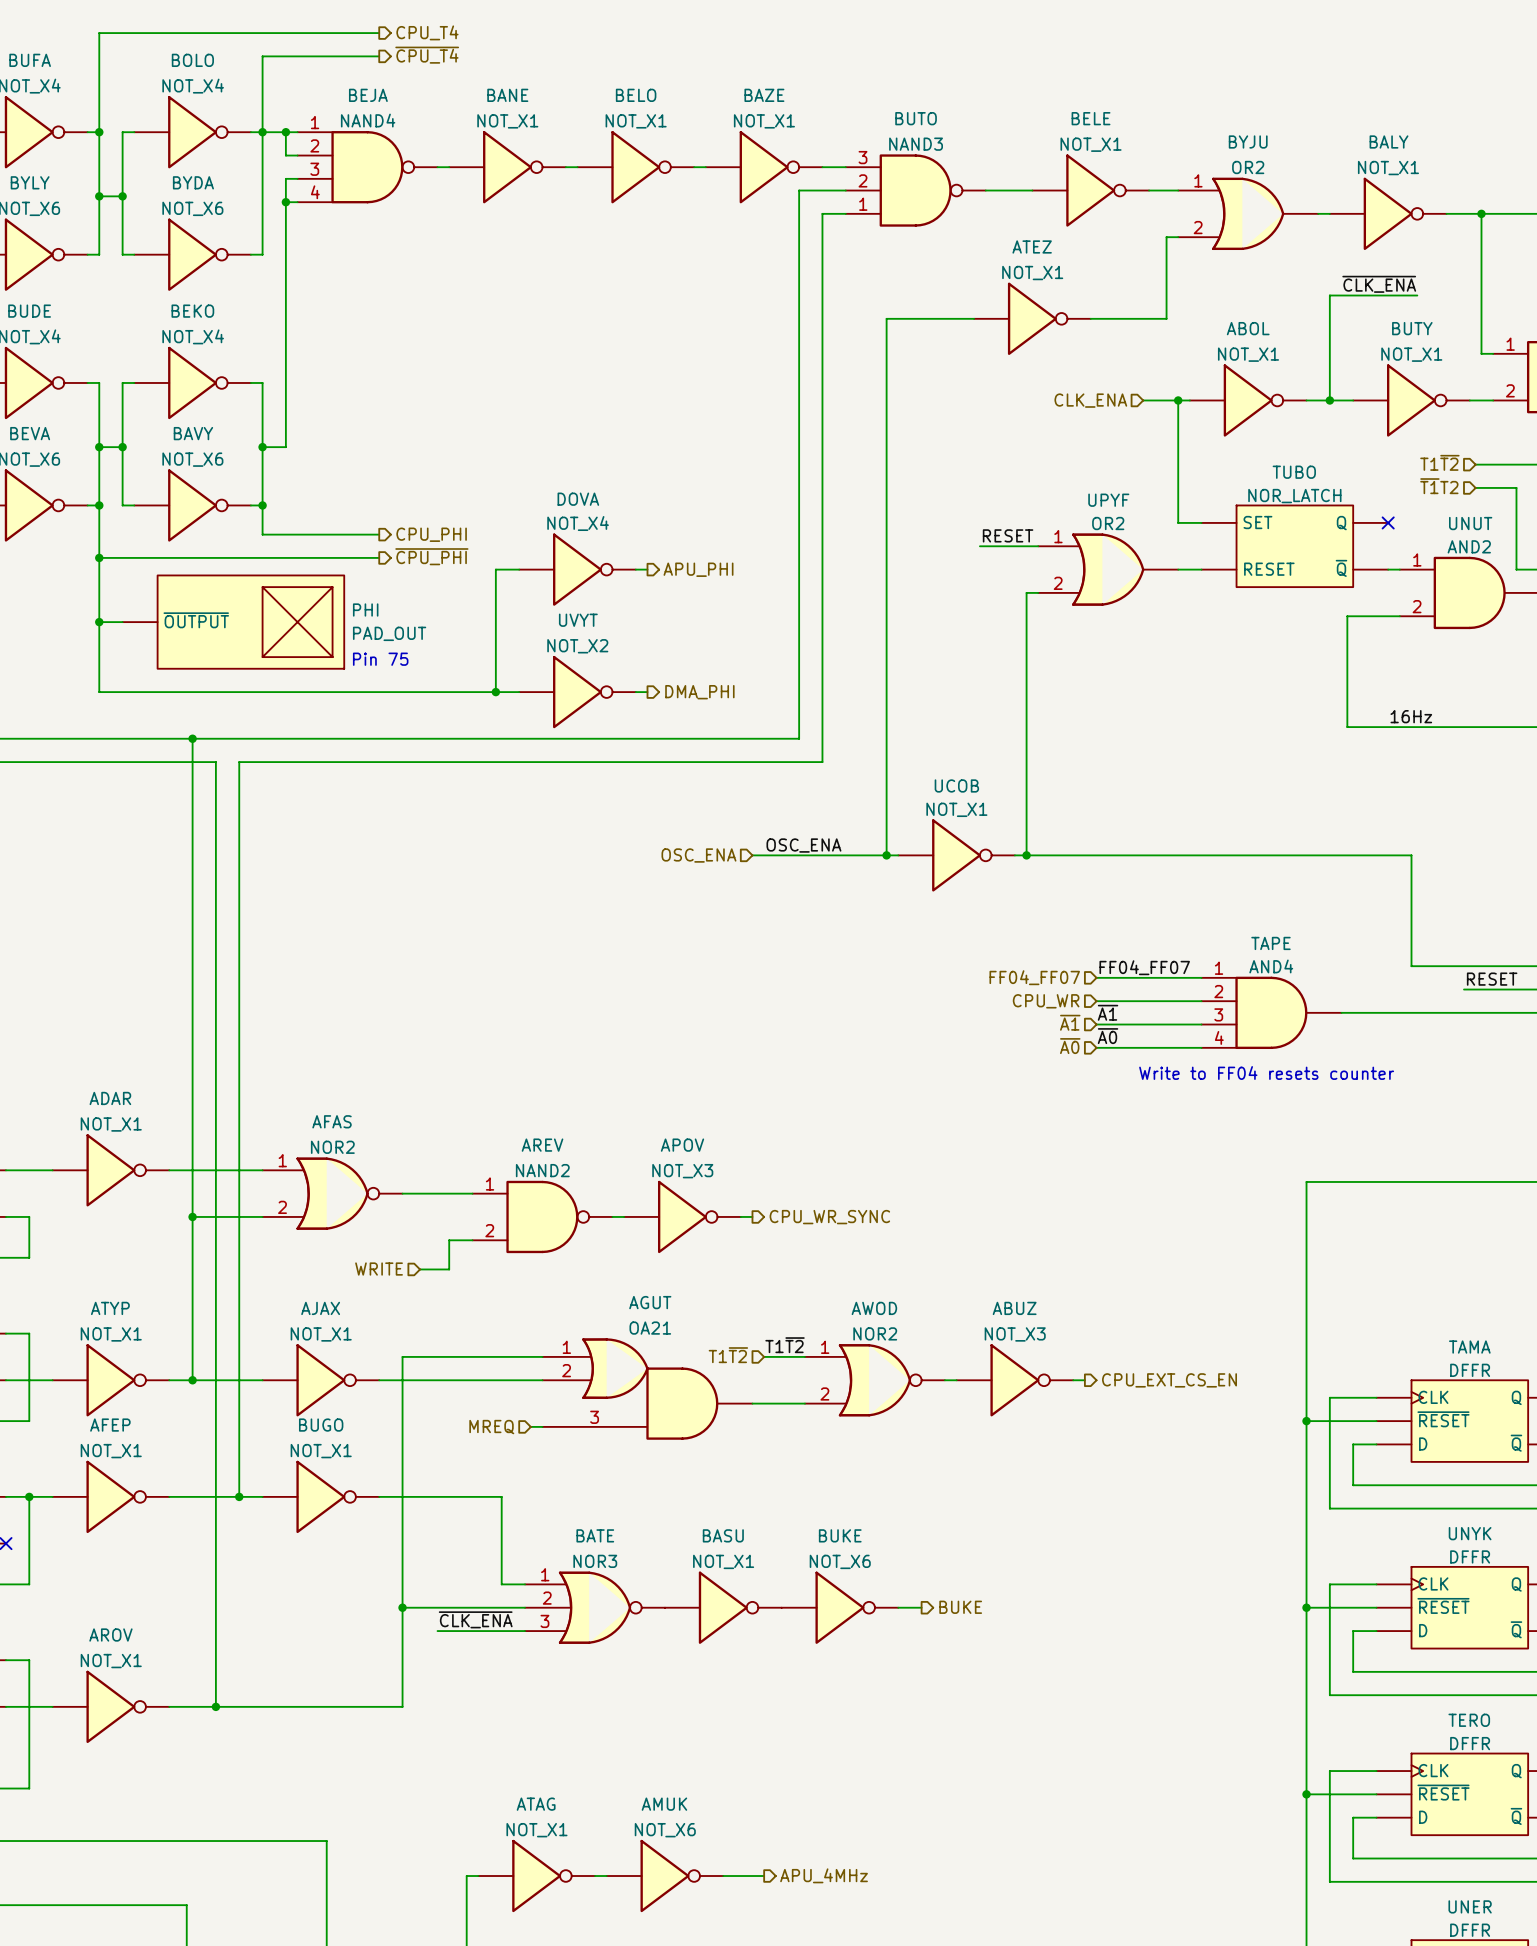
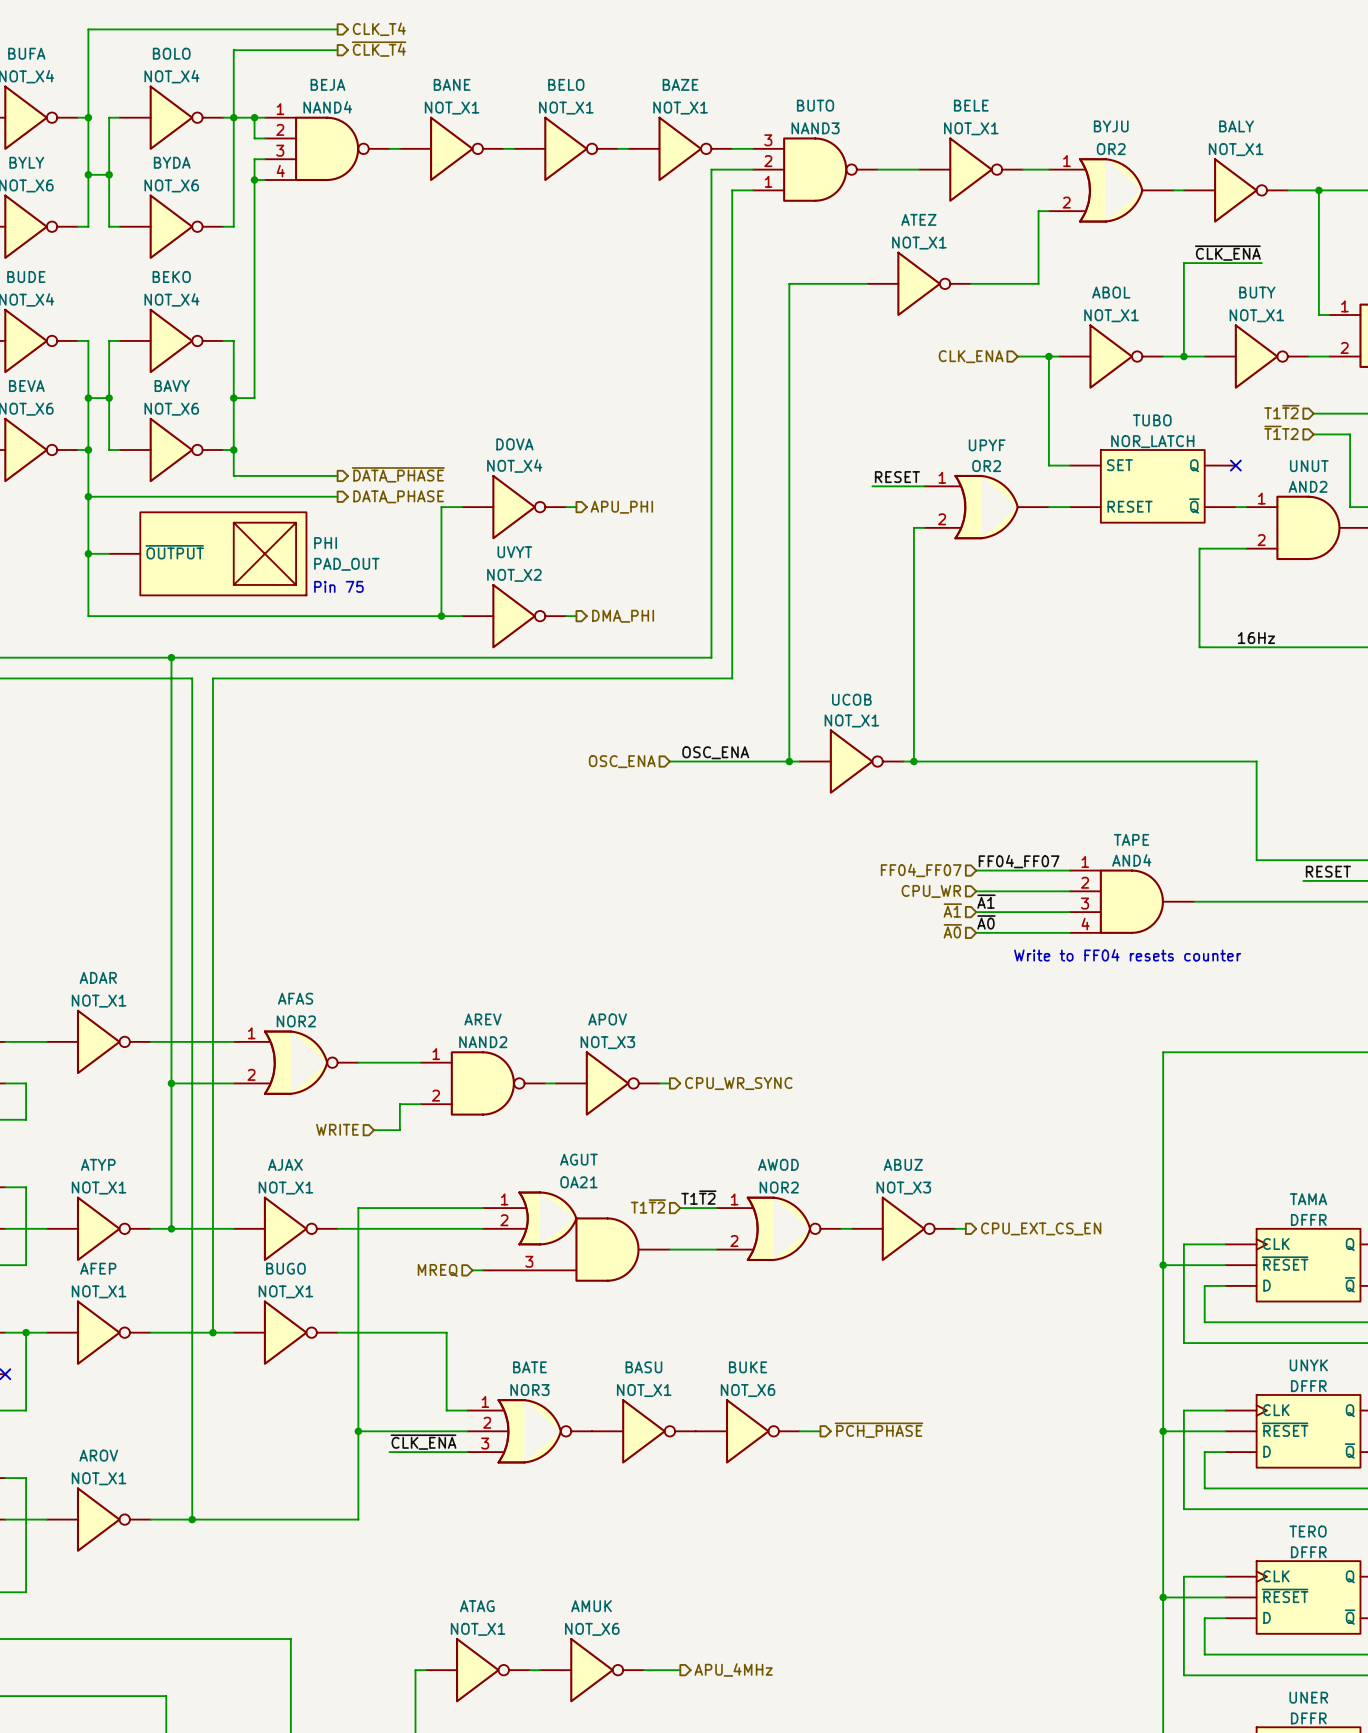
hierarchical label: CPU_T4 (427, 32) -> CLK_T4 (379, 29)
hierarchical label: ~{CPU_T4} (427, 55) -> ~{CLK_T4} (379, 49)
hierarchical label: CPU_PHI (431, 534) -> ~{DATA_PHASE} (398, 474)
hierarchical label: ~{CPU_PHI} (431, 556) -> DATA_PHASE (398, 496)
hierarchical label: BUKE (960, 1607) -> ~{PCH_PHASE} (878, 1430)

